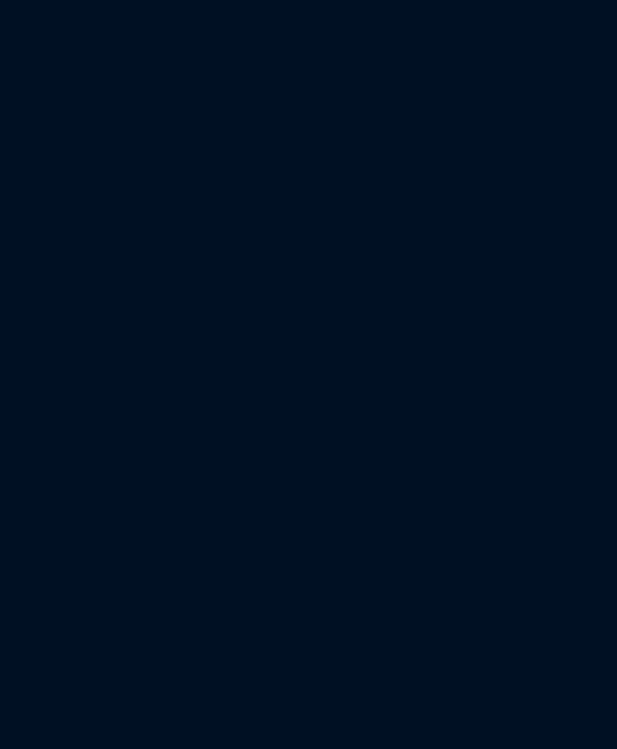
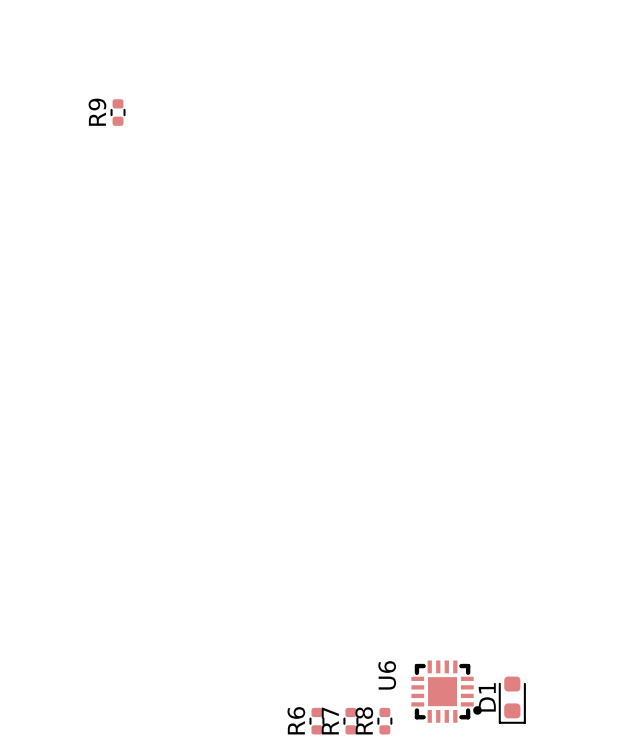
R9: none -> (118, 112)
U6: none -> (446, 691)
D1: none -> (512, 700)
R6: none -> (316, 721)
R7: none -> (350, 721)
R8: none -> (384, 721)

